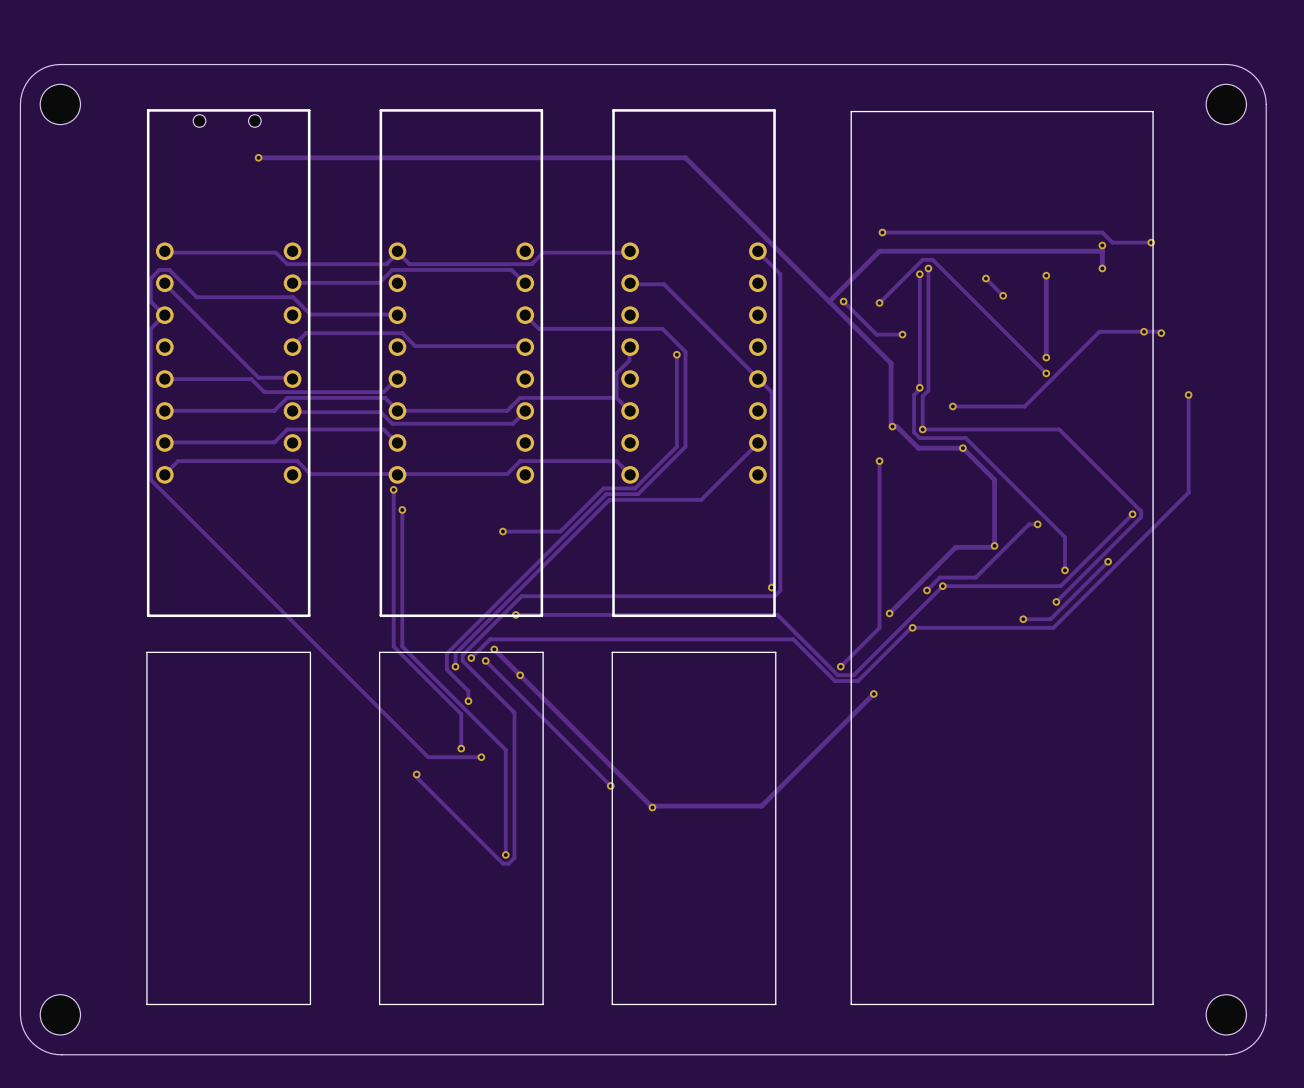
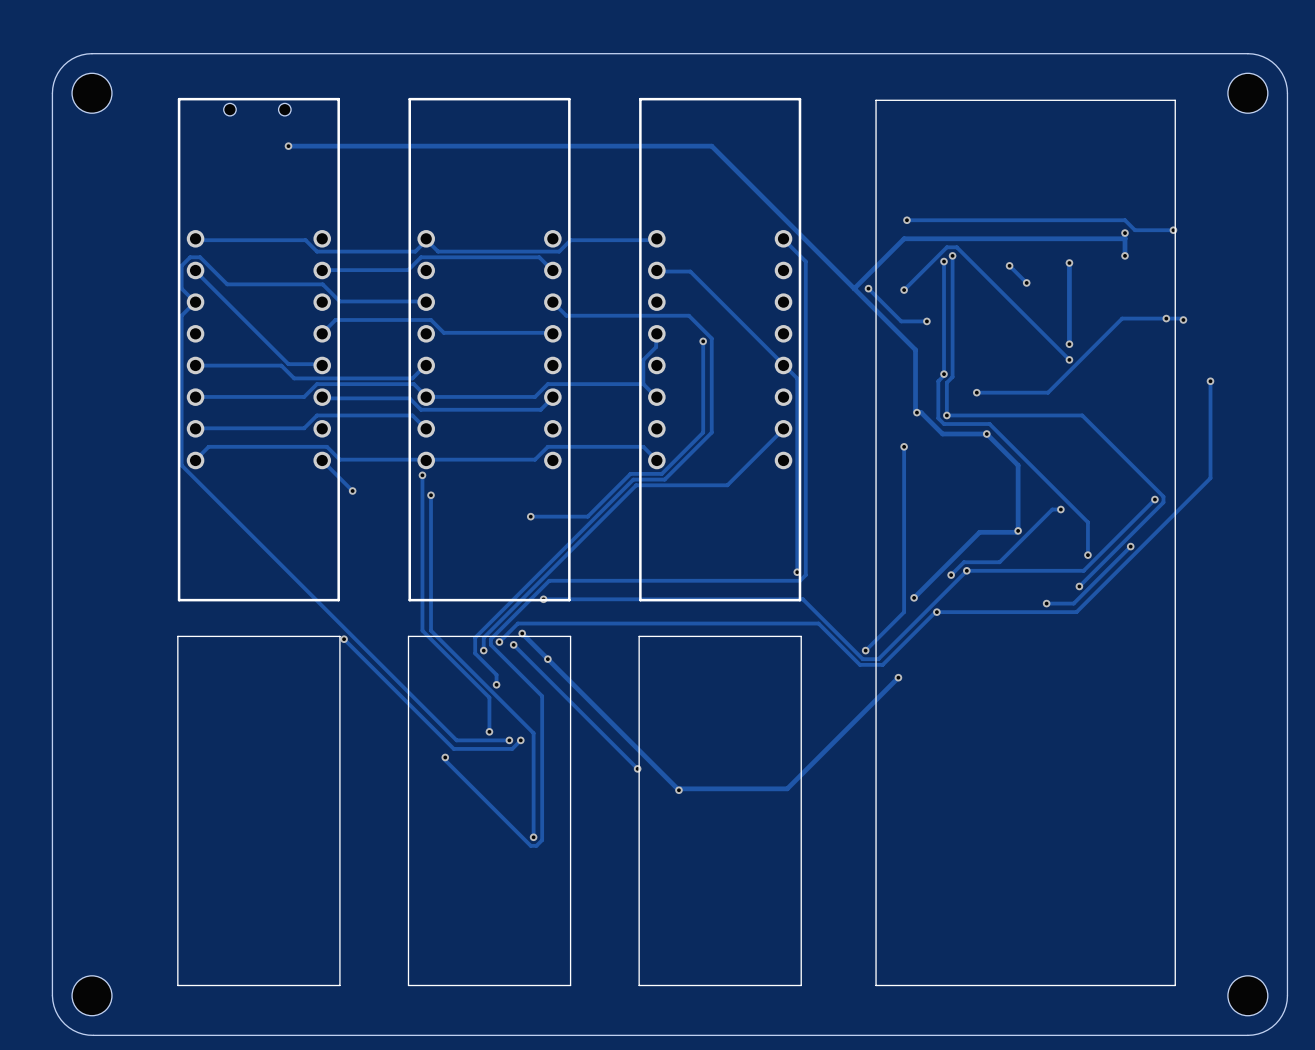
track: none -> (322, 460) (352, 491)
via: none -> (352, 491)
track: none -> (344, 639) (453, 748) (512, 748) (520, 740)
via: none -> (344, 639)
via: none -> (520, 740)

